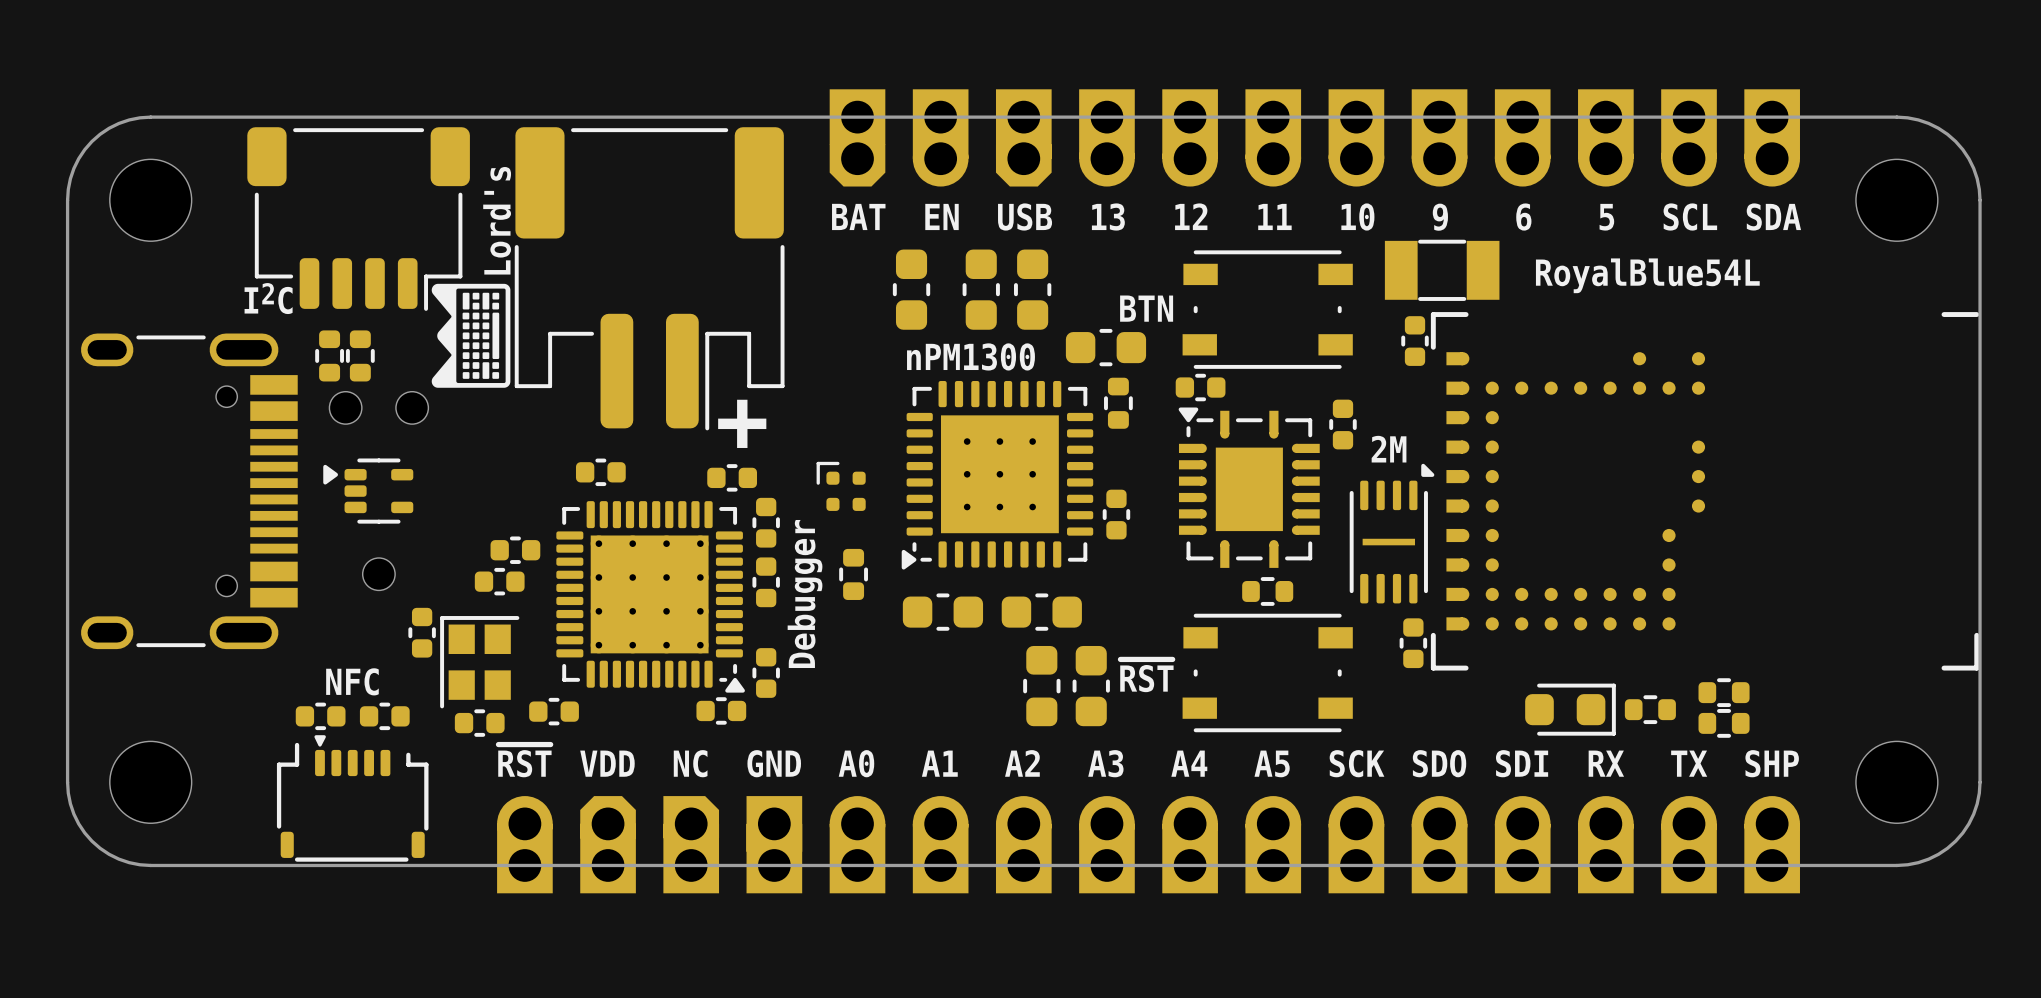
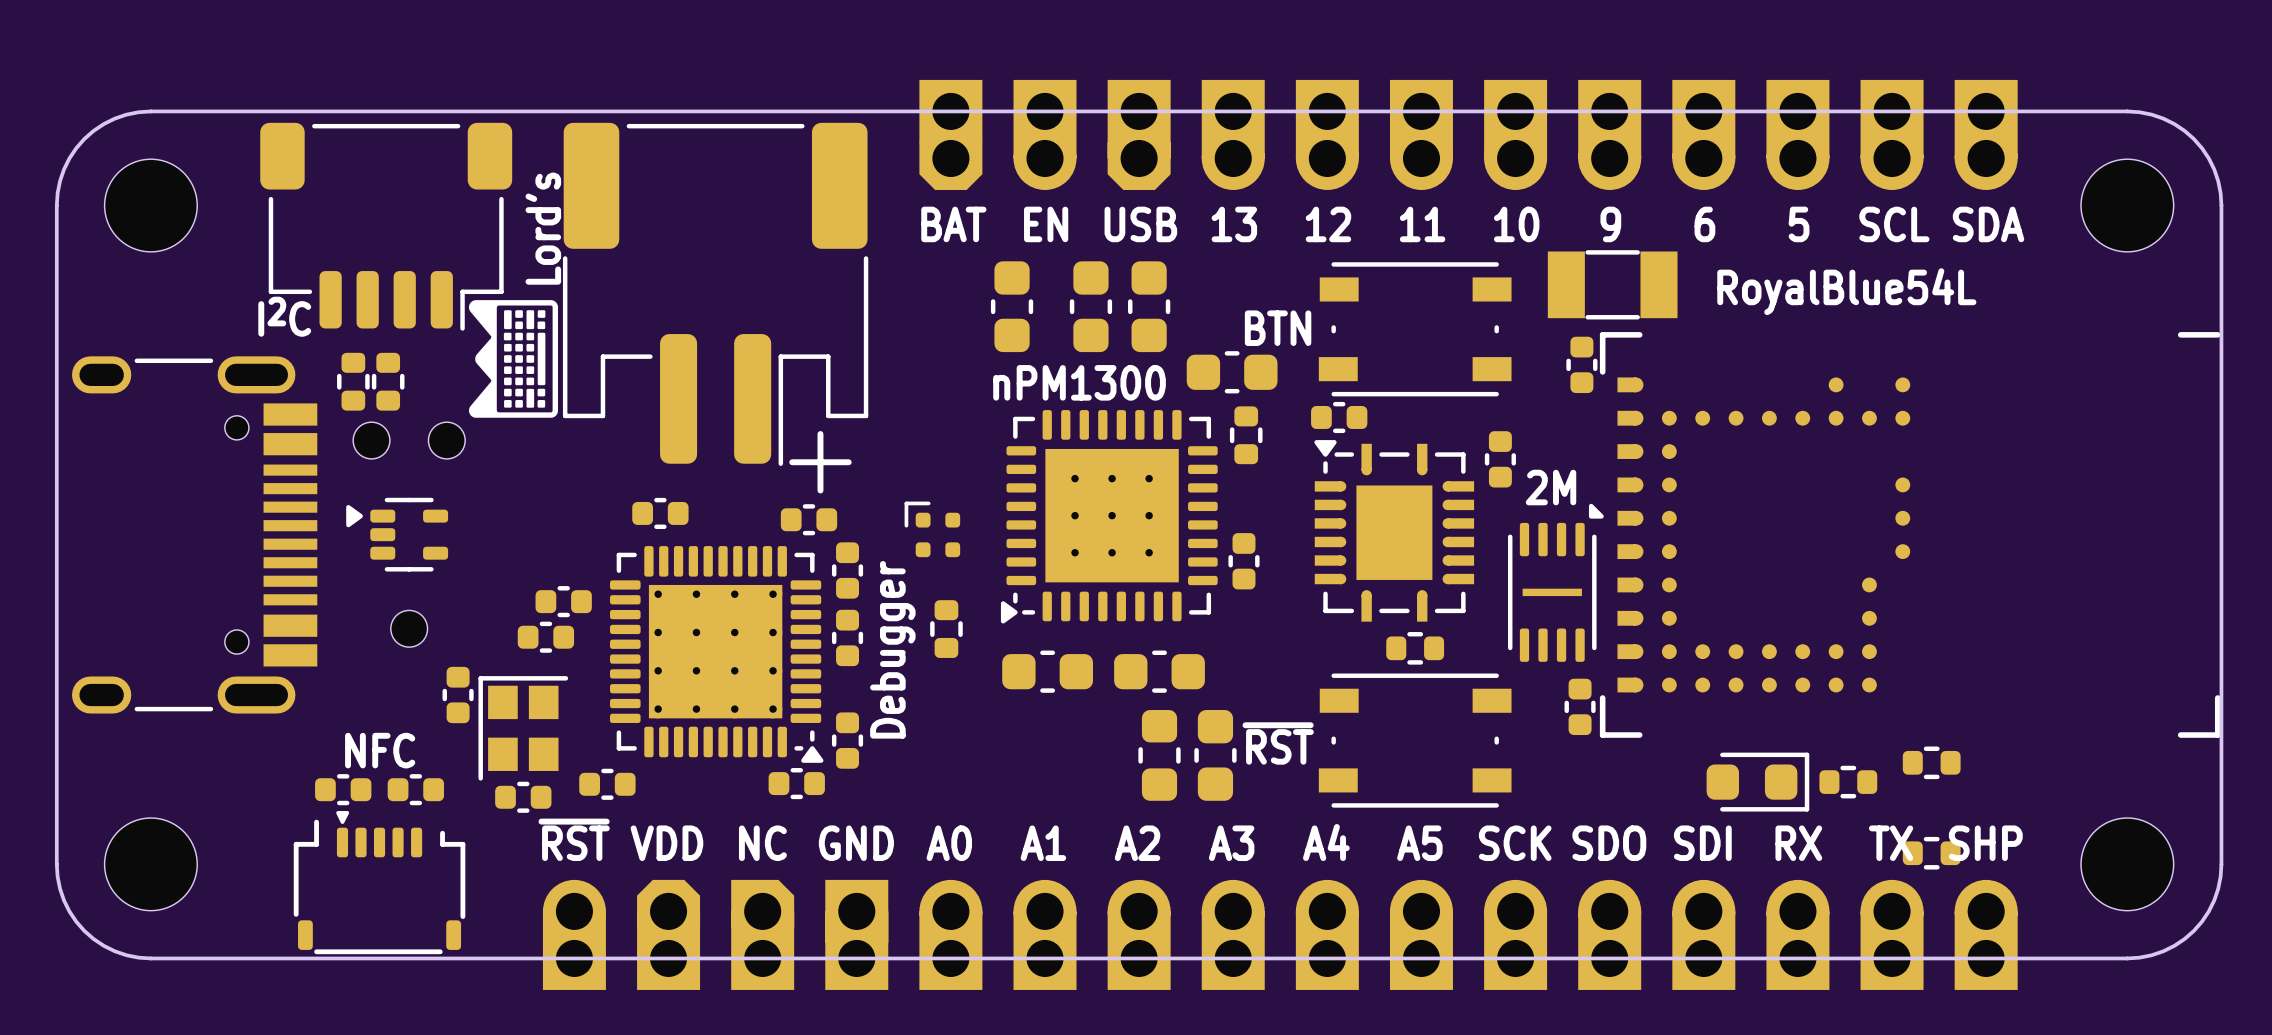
part position: (1724, 723) -> (1931, 853)

